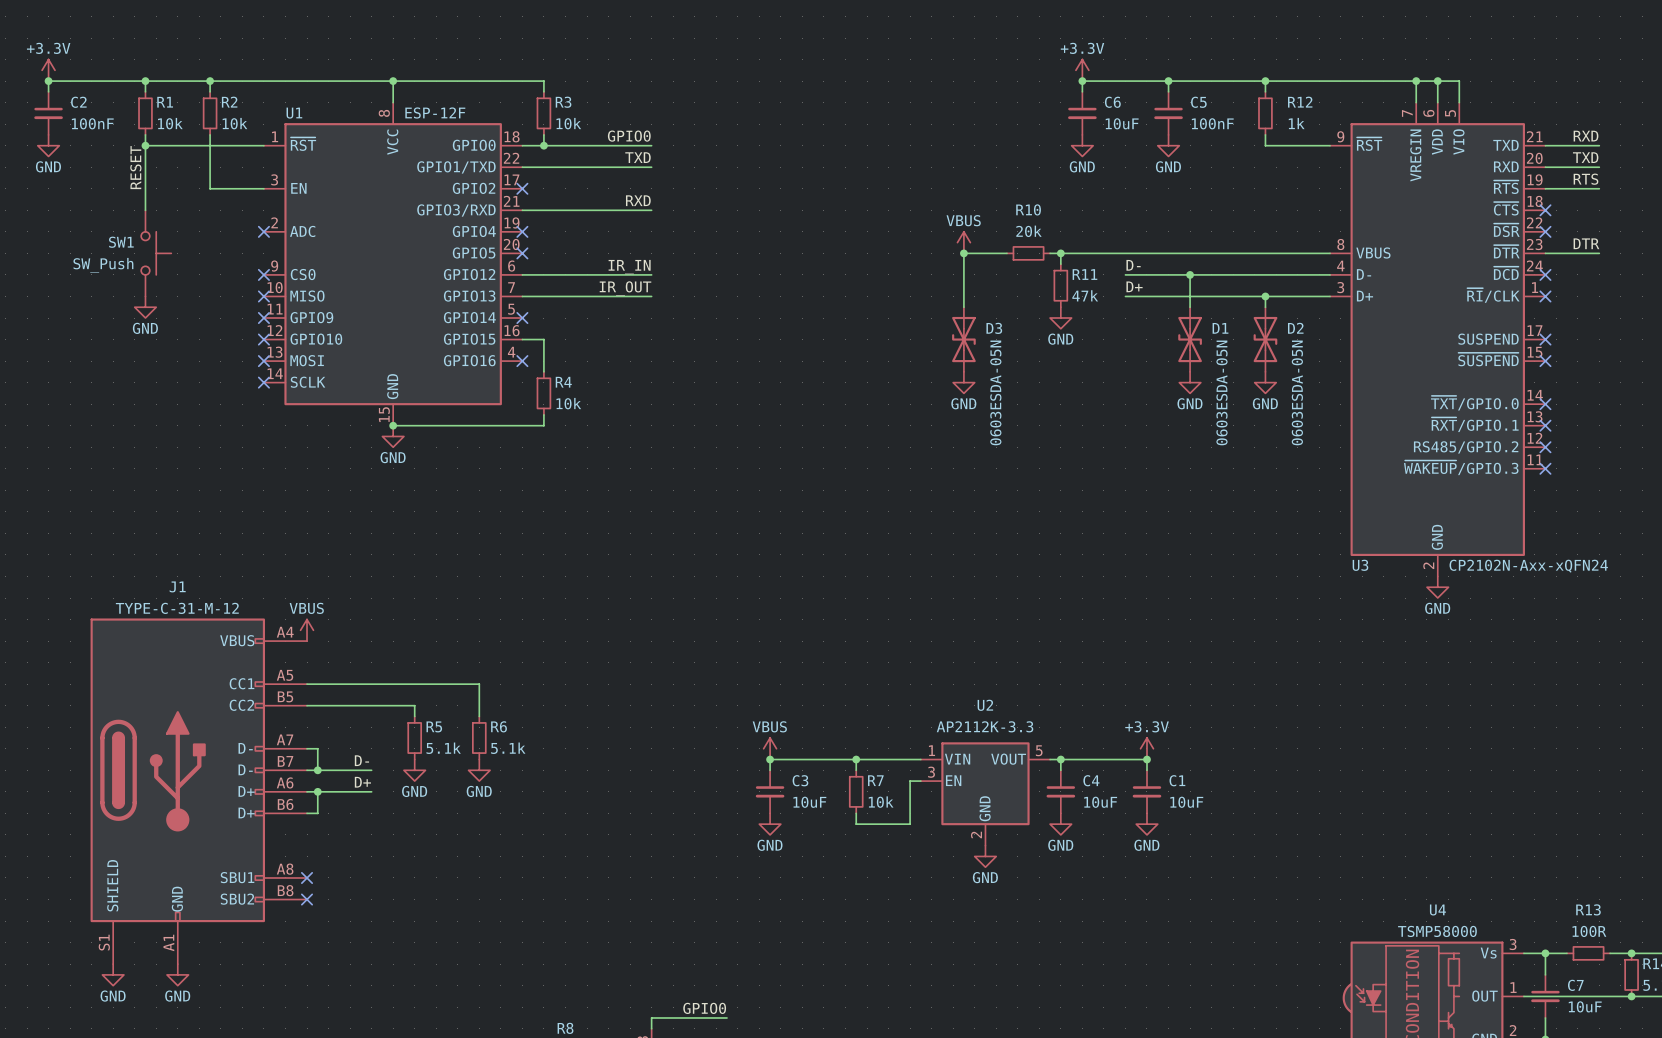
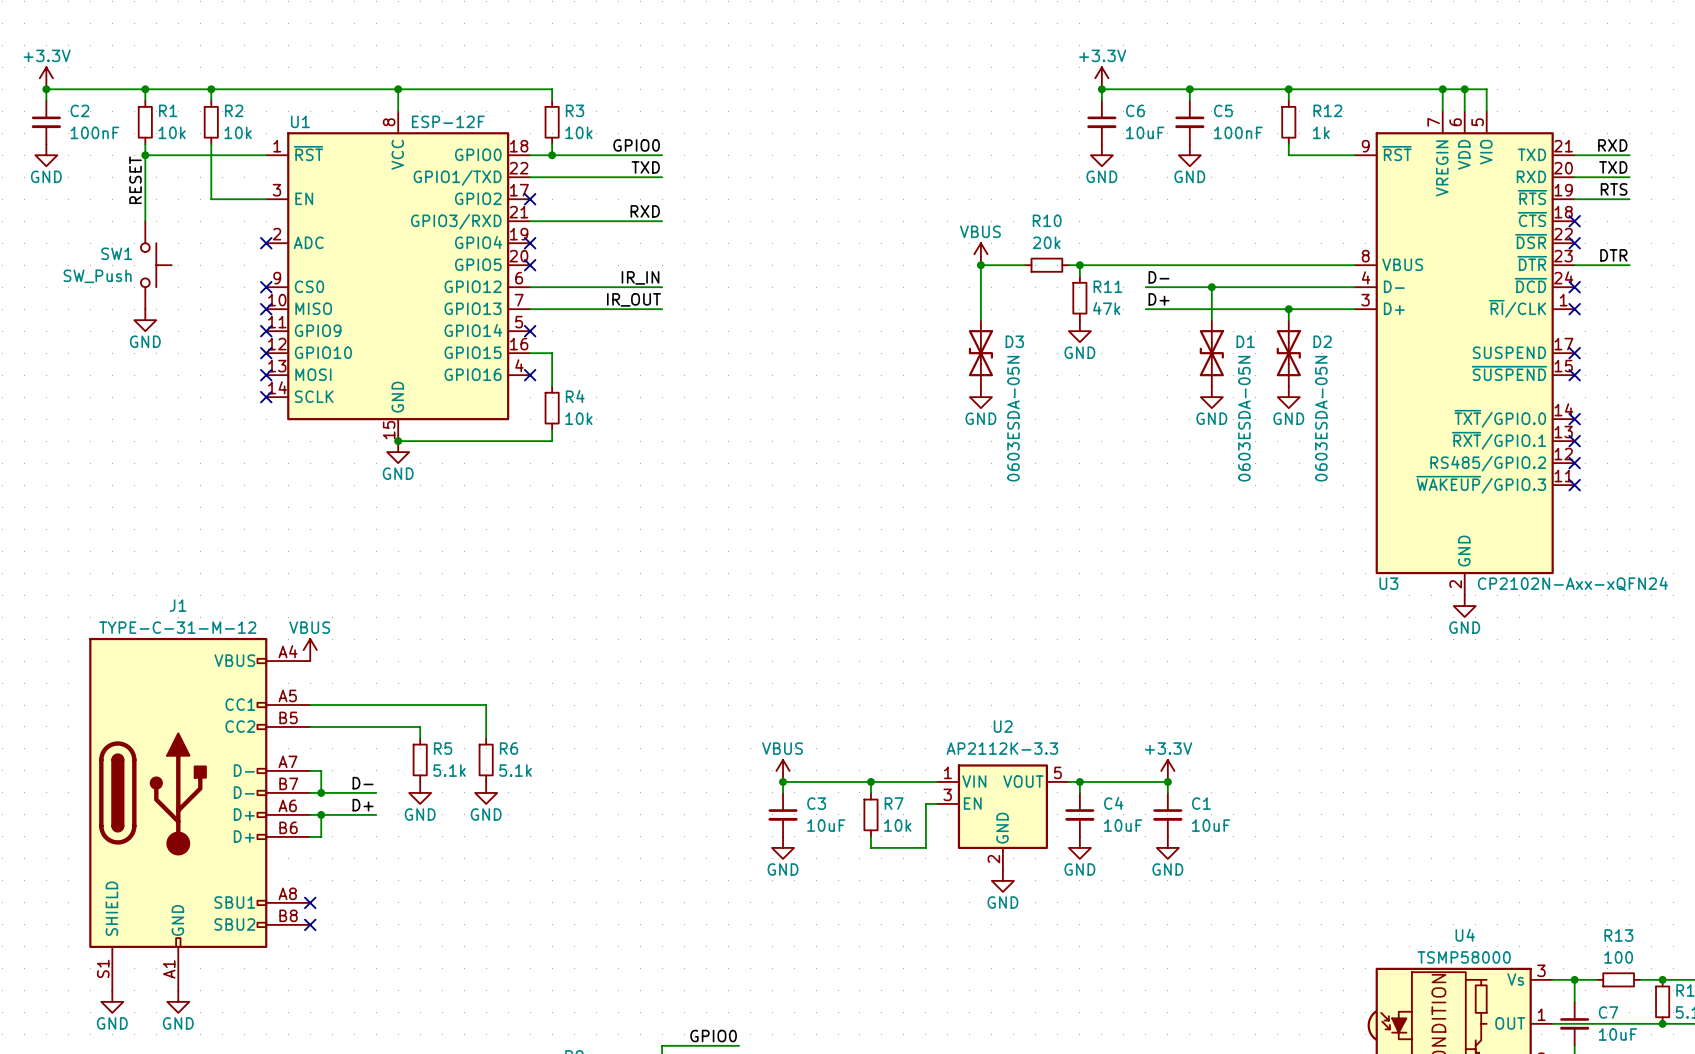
R13 value: 100R (1589, 931) -> 100 (1618, 957)

